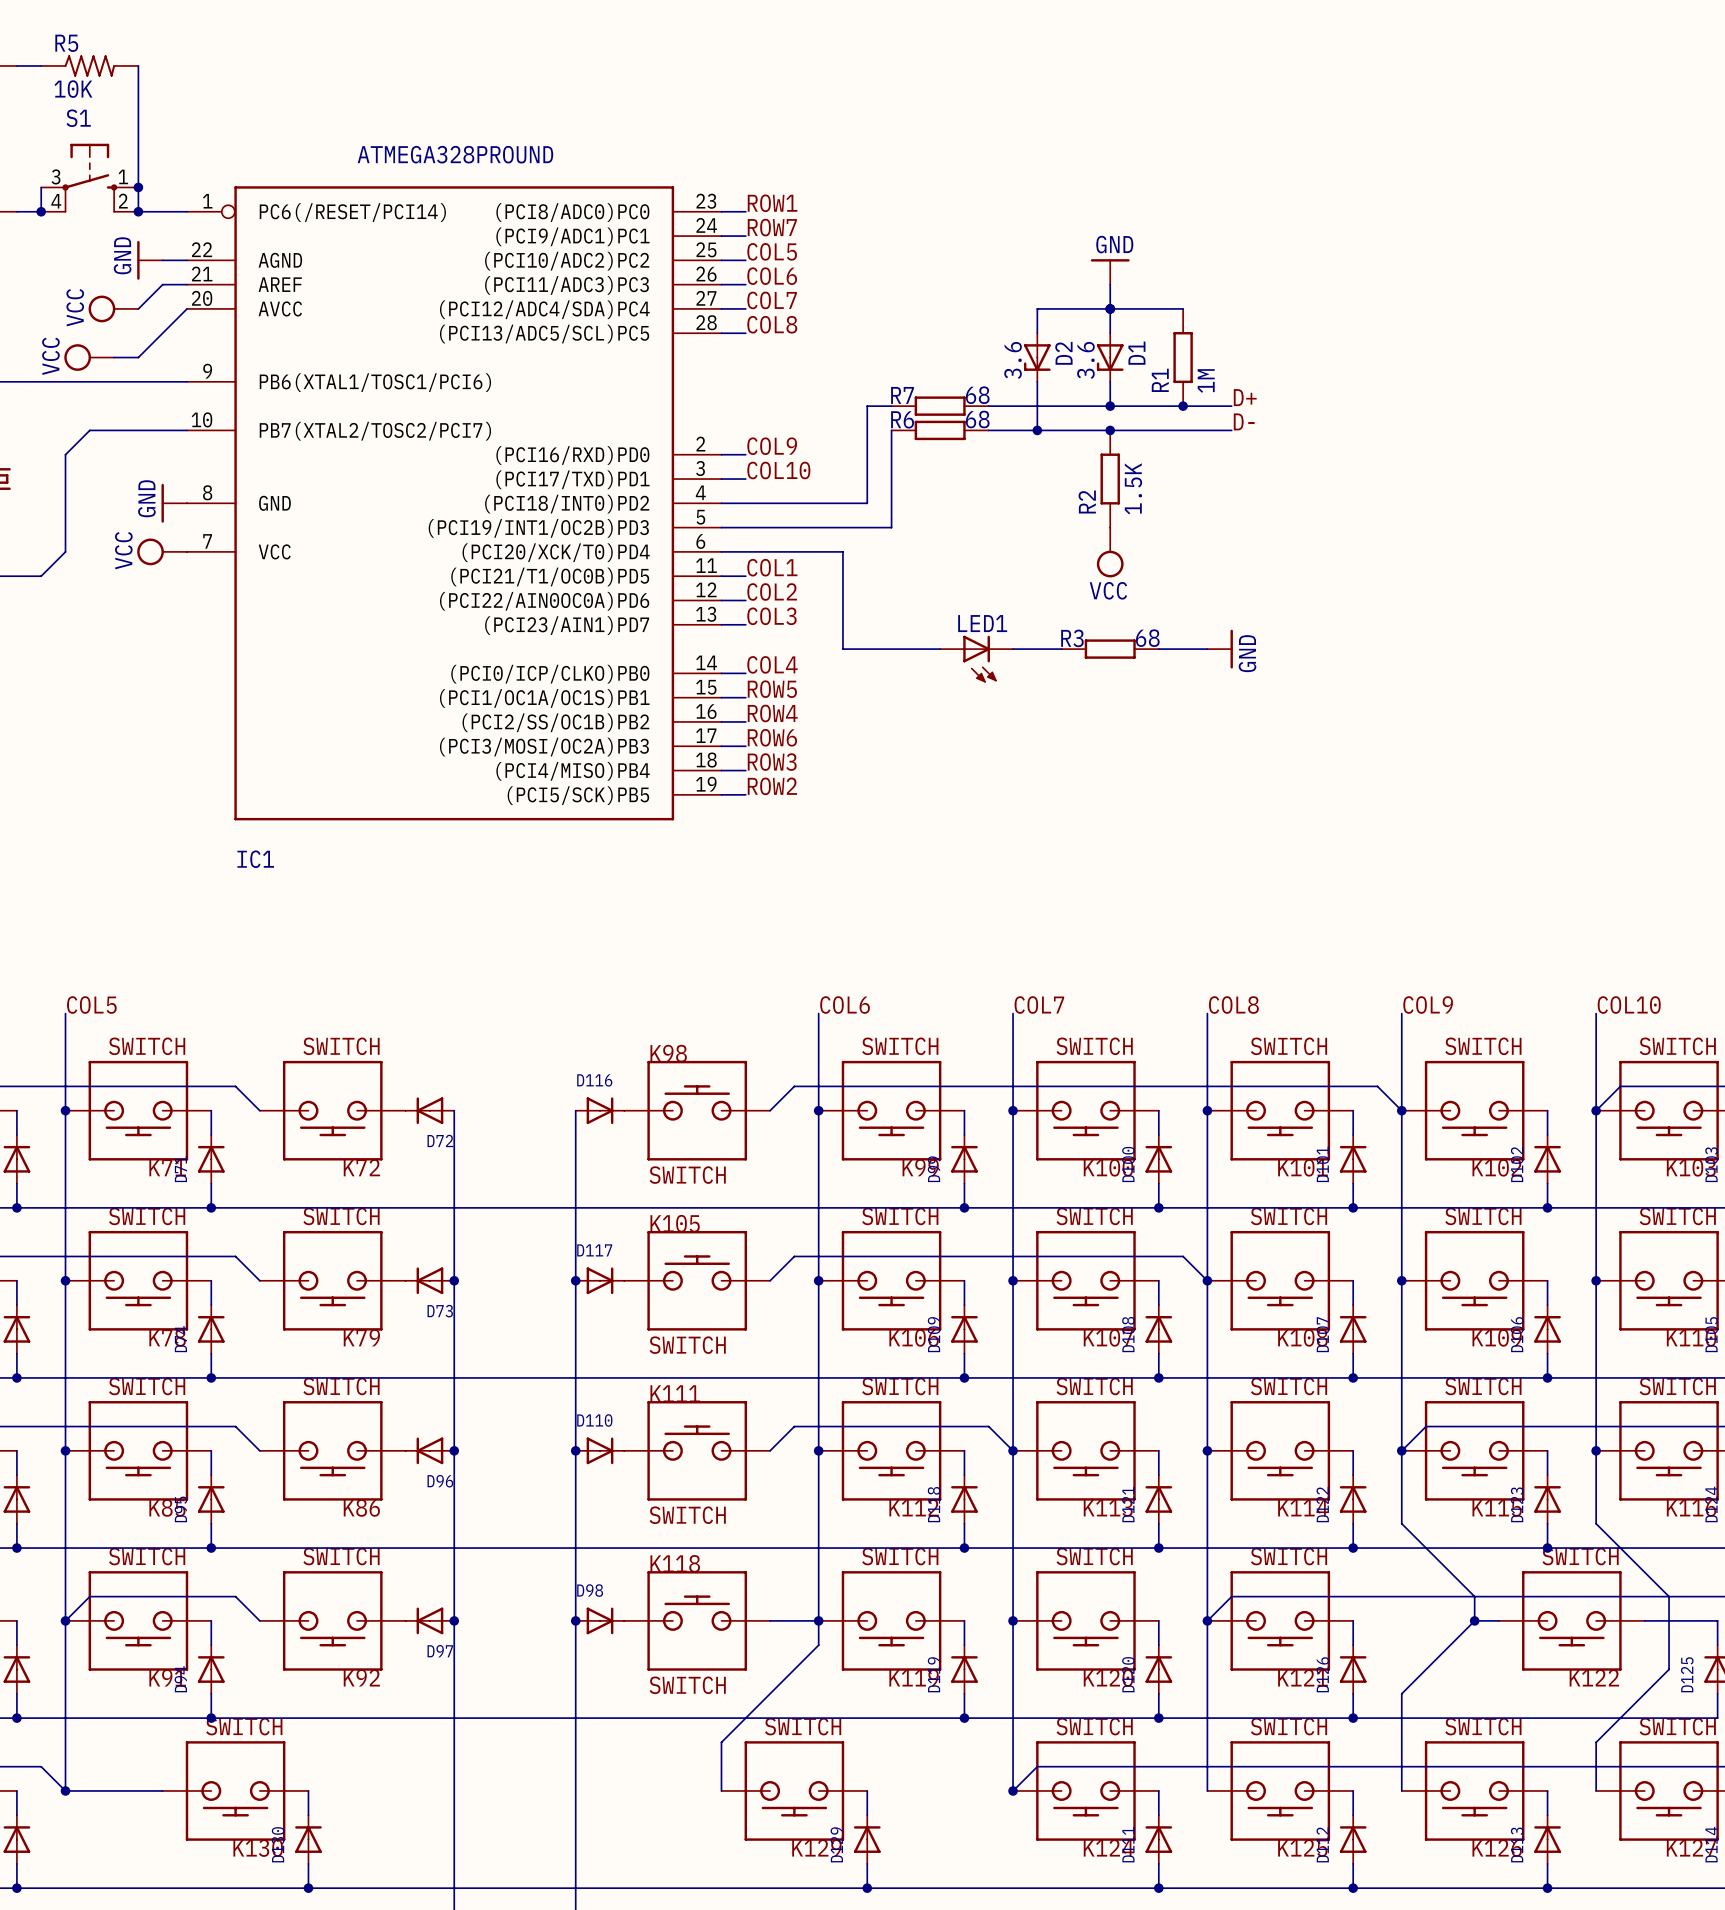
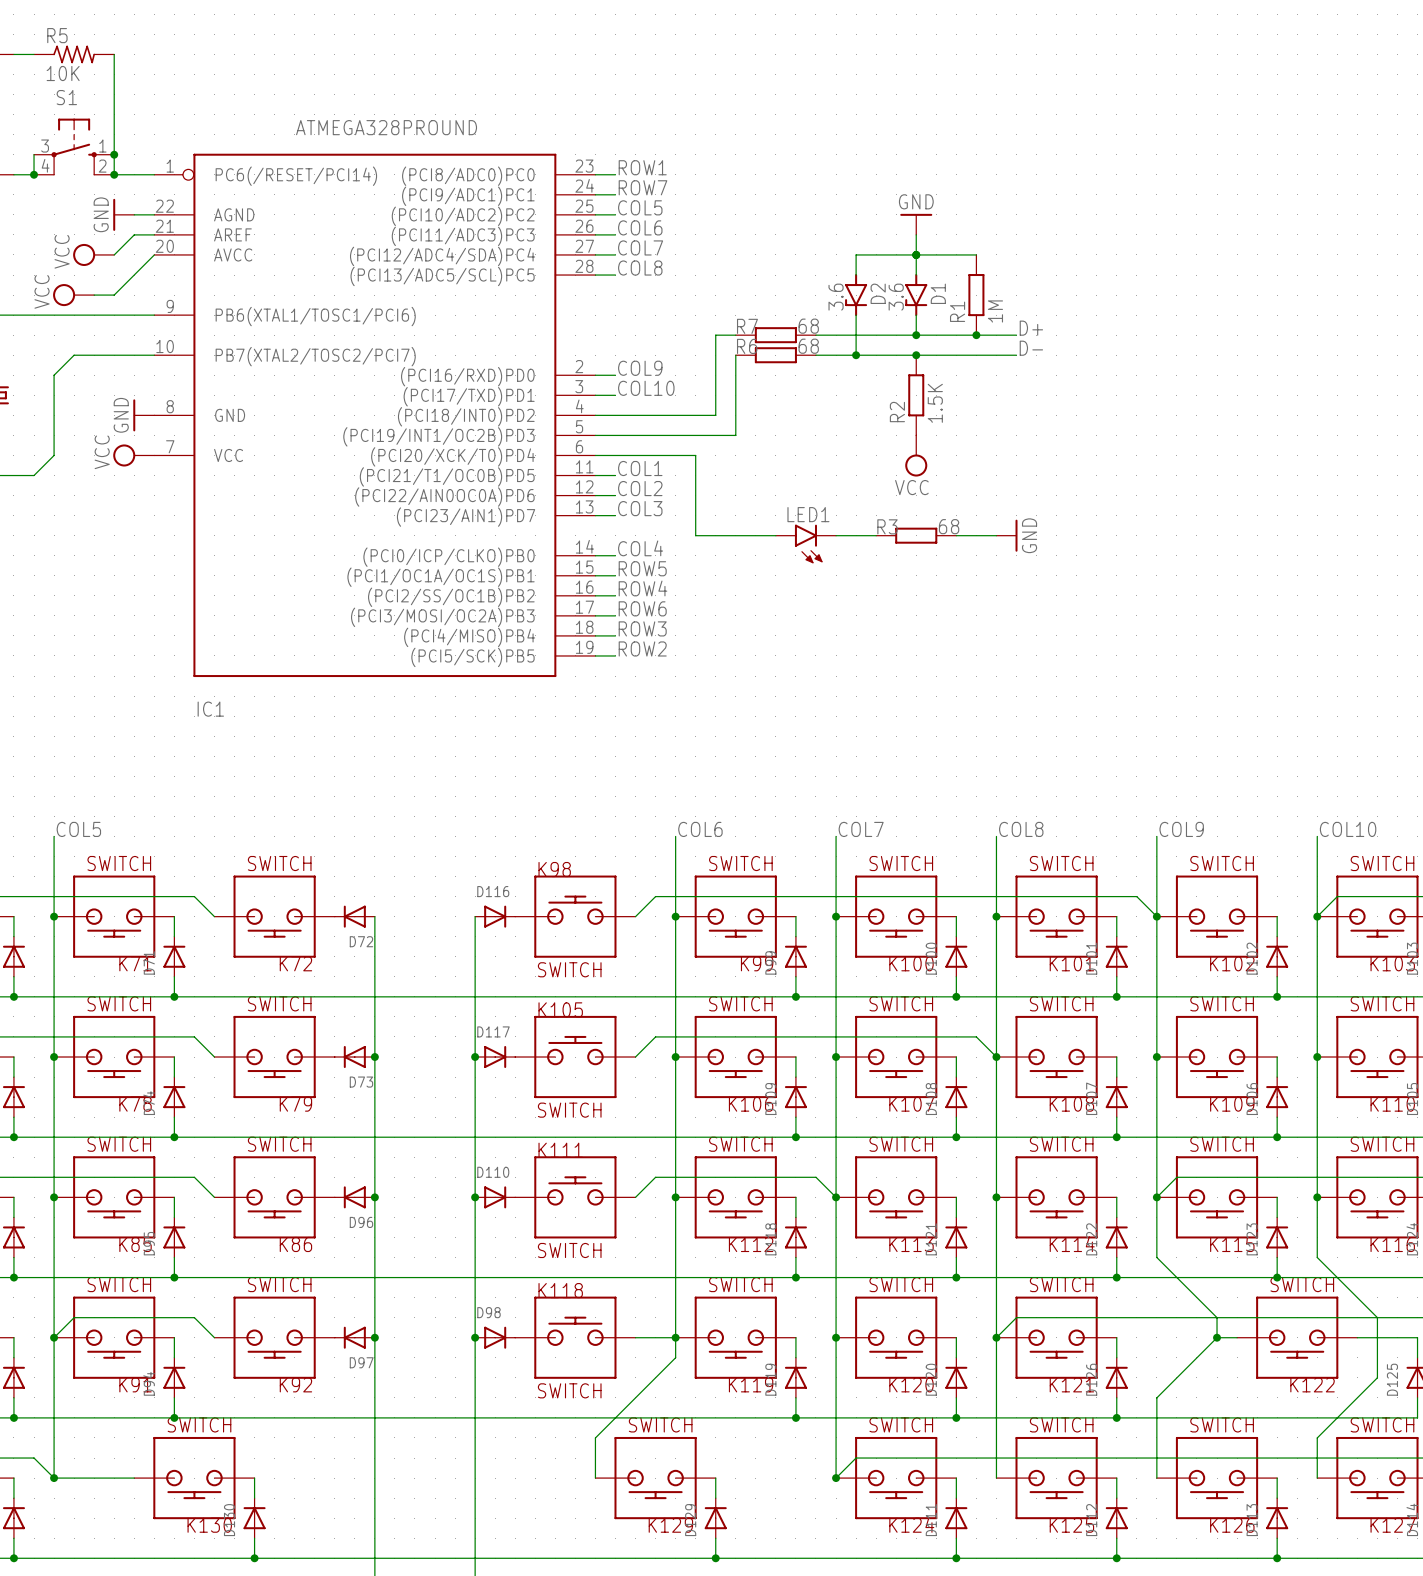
D2 symbol: [1023, 333, 1051, 382] -> [845, 274, 868, 317]
D1 symbol: [1096, 333, 1124, 382] -> [905, 274, 928, 317]
LED1 symbol: [940, 635, 1014, 683] -> [775, 524, 837, 564]

